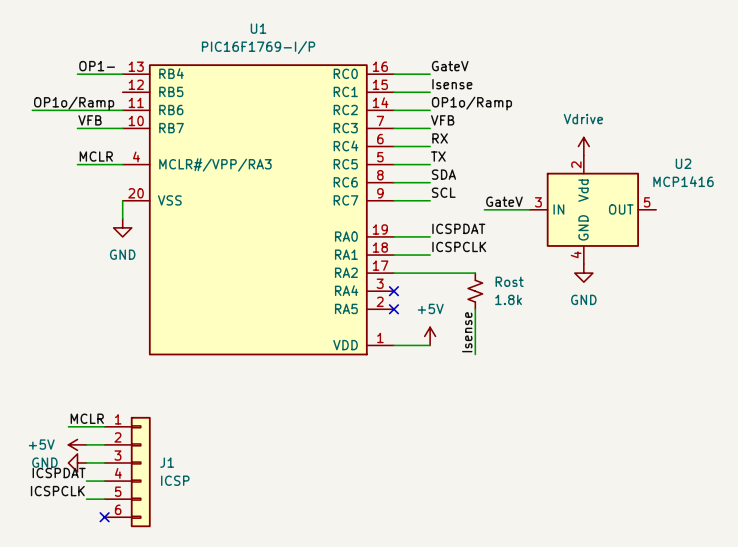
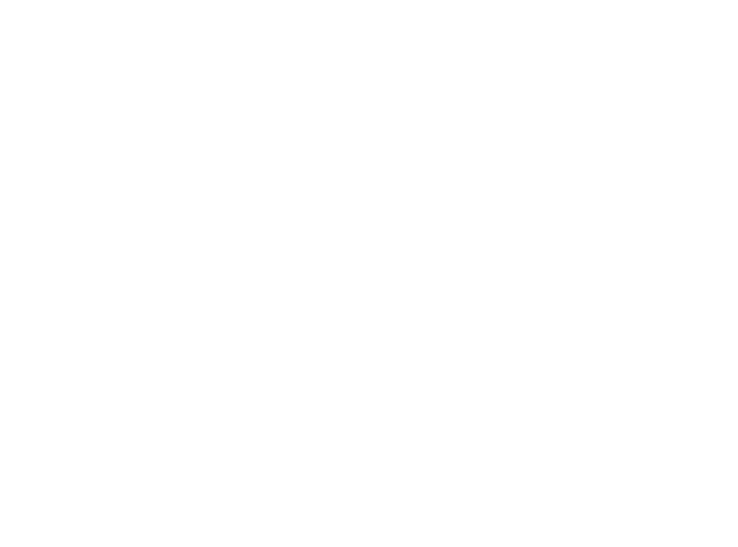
label: OP1- (97, 66) -> none
label: GateV (450, 66) -> none
wire: (77, 74) (122, 74) -> none
wire: (393, 74) (430, 74) -> none
label: Isense (452, 84) -> none
wire: (393, 92) (430, 92) -> none
label: OP1o/Ramp (74, 103) -> none
label: OP1o/Ramp (471, 103) -> none
wire: (32, 110) (122, 110) -> none
wire: (393, 110) (430, 110) -> none
label: VFB (90, 120) -> none
label: VFB (442, 120) -> none
wire: (77, 128) (122, 128) -> none
wire: (393, 128) (430, 128) -> none
label: RX (440, 138) -> none
wire: (393, 146) (430, 146) -> none
power symbol: Vdrive (583, 146) -> none
label: MCLR (96, 156) -> none
label: TX (438, 156) -> none
wire: (77, 164) (122, 164) -> none
wire: (393, 164) (430, 164) -> none
label: SDA (443, 174) -> none
wire: (393, 182) (430, 182) -> none
label: SCL (443, 192) -> none
wire: (122, 200) (122, 218) -> none
wire: (393, 200) (430, 200) -> none
label: GateV (504, 201) -> none
U1: PIC16F1769-I/P (258, 209) -> none
wire: (484, 209) (529, 209) -> none
U2: MCP1416 (592, 209) -> none
power symbol: GND (122, 227) -> none
label: ICSPDAT (458, 228) -> none
wire: (393, 236) (430, 236) -> none
label: ICSPCLK (459, 246) -> none
wire: (393, 255) (430, 255) -> none
wire: (393, 273) (475, 273) -> none
power symbol: GND (583, 273) -> none
no-connect mark: (393, 291) -> none
Rost: 1.8k (475, 291) -> none
no-connect mark: (393, 309) -> none
wire: (475, 309) (475, 354) -> none
label: Isense (467, 332) -> none
power symbol: +5V (430, 336) -> none
wire: (393, 345) (430, 345) -> none
label: MCLR (87, 418) -> none
wire: (68, 426) (104, 426) -> none
power symbol: +5V (77, 444) -> none
wire: (86, 444) (104, 444) -> none
power symbol: GND (77, 462) -> none
wire: (86, 462) (104, 462) -> none
J1: ICSP (127, 472) -> none
label: ICSPDAT (59, 473) -> none
wire: (86, 481) (104, 481) -> none
label: ICSPCLK (57, 491) -> none
wire: (86, 499) (104, 499) -> none
no-connect mark: (104, 517) -> none

